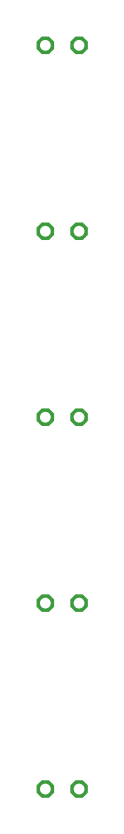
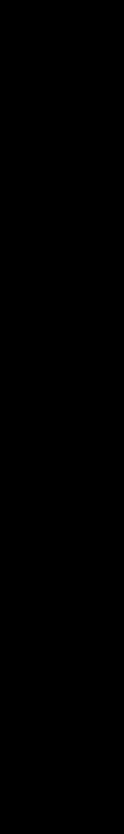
part: (62, 45) -> none
part: (62, 231) -> none
part: (62, 417) -> none
part: (62, 603) -> none
part: (62, 789) -> none

